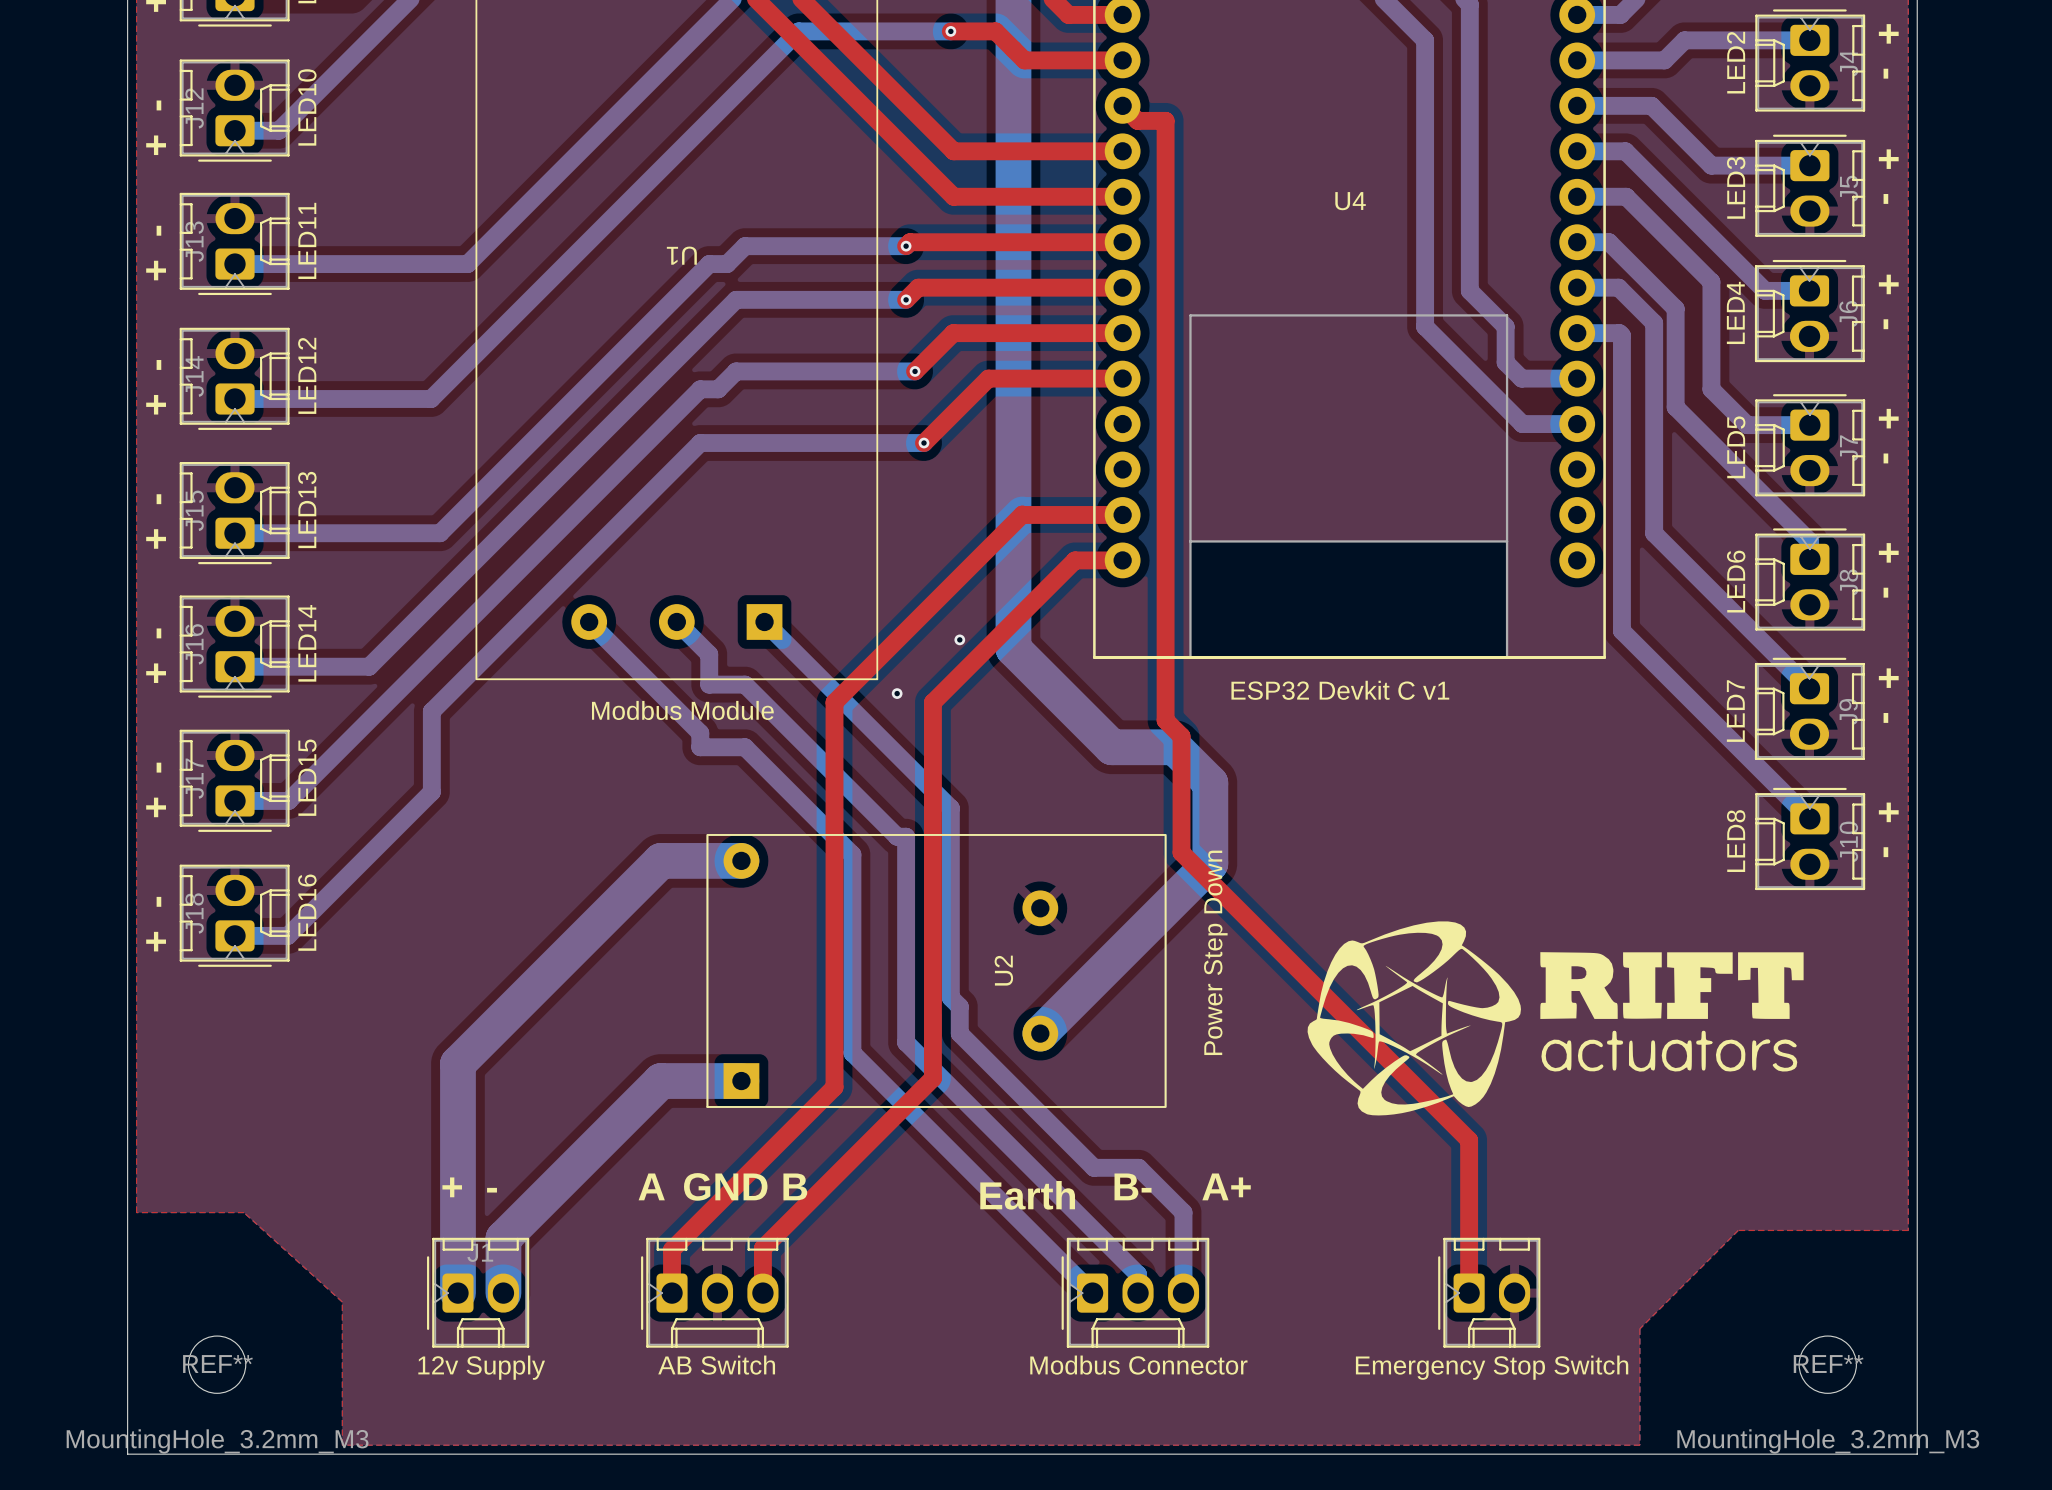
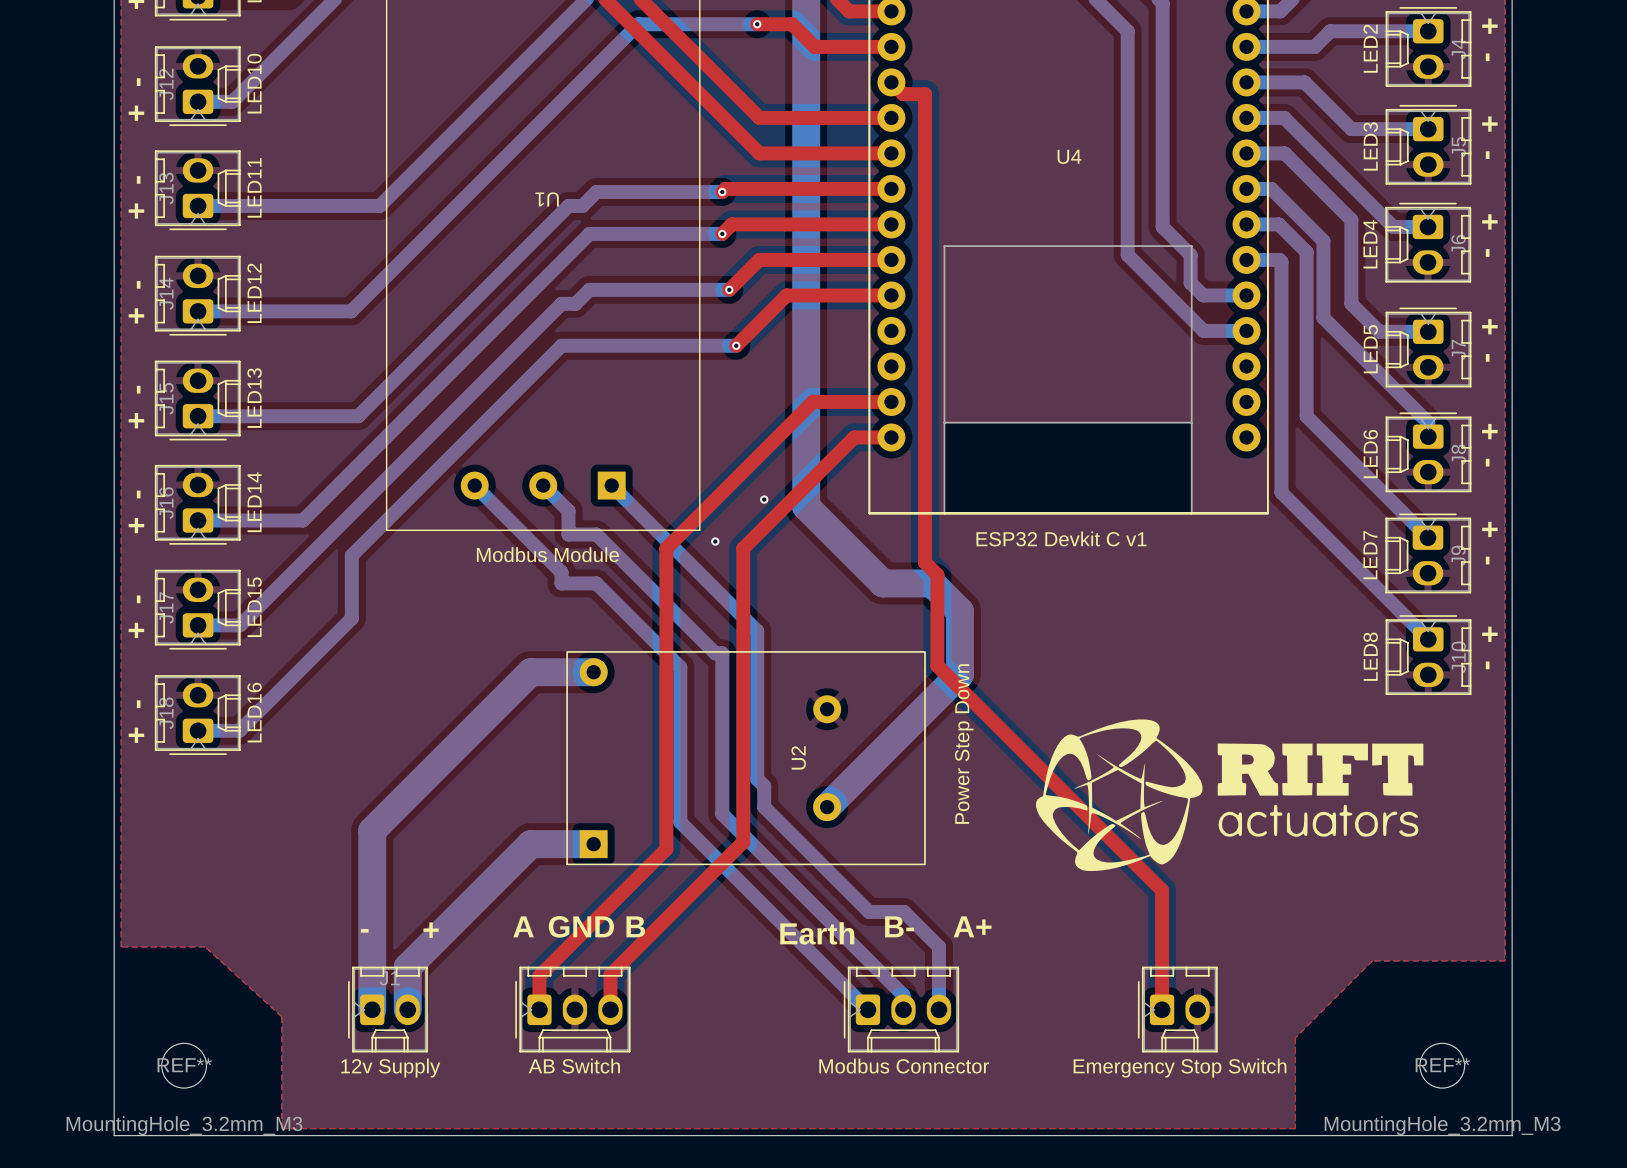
text position: + (452, 1187) -> + (431, 930)
text position: - (492, 1190) -> - (364, 930)

